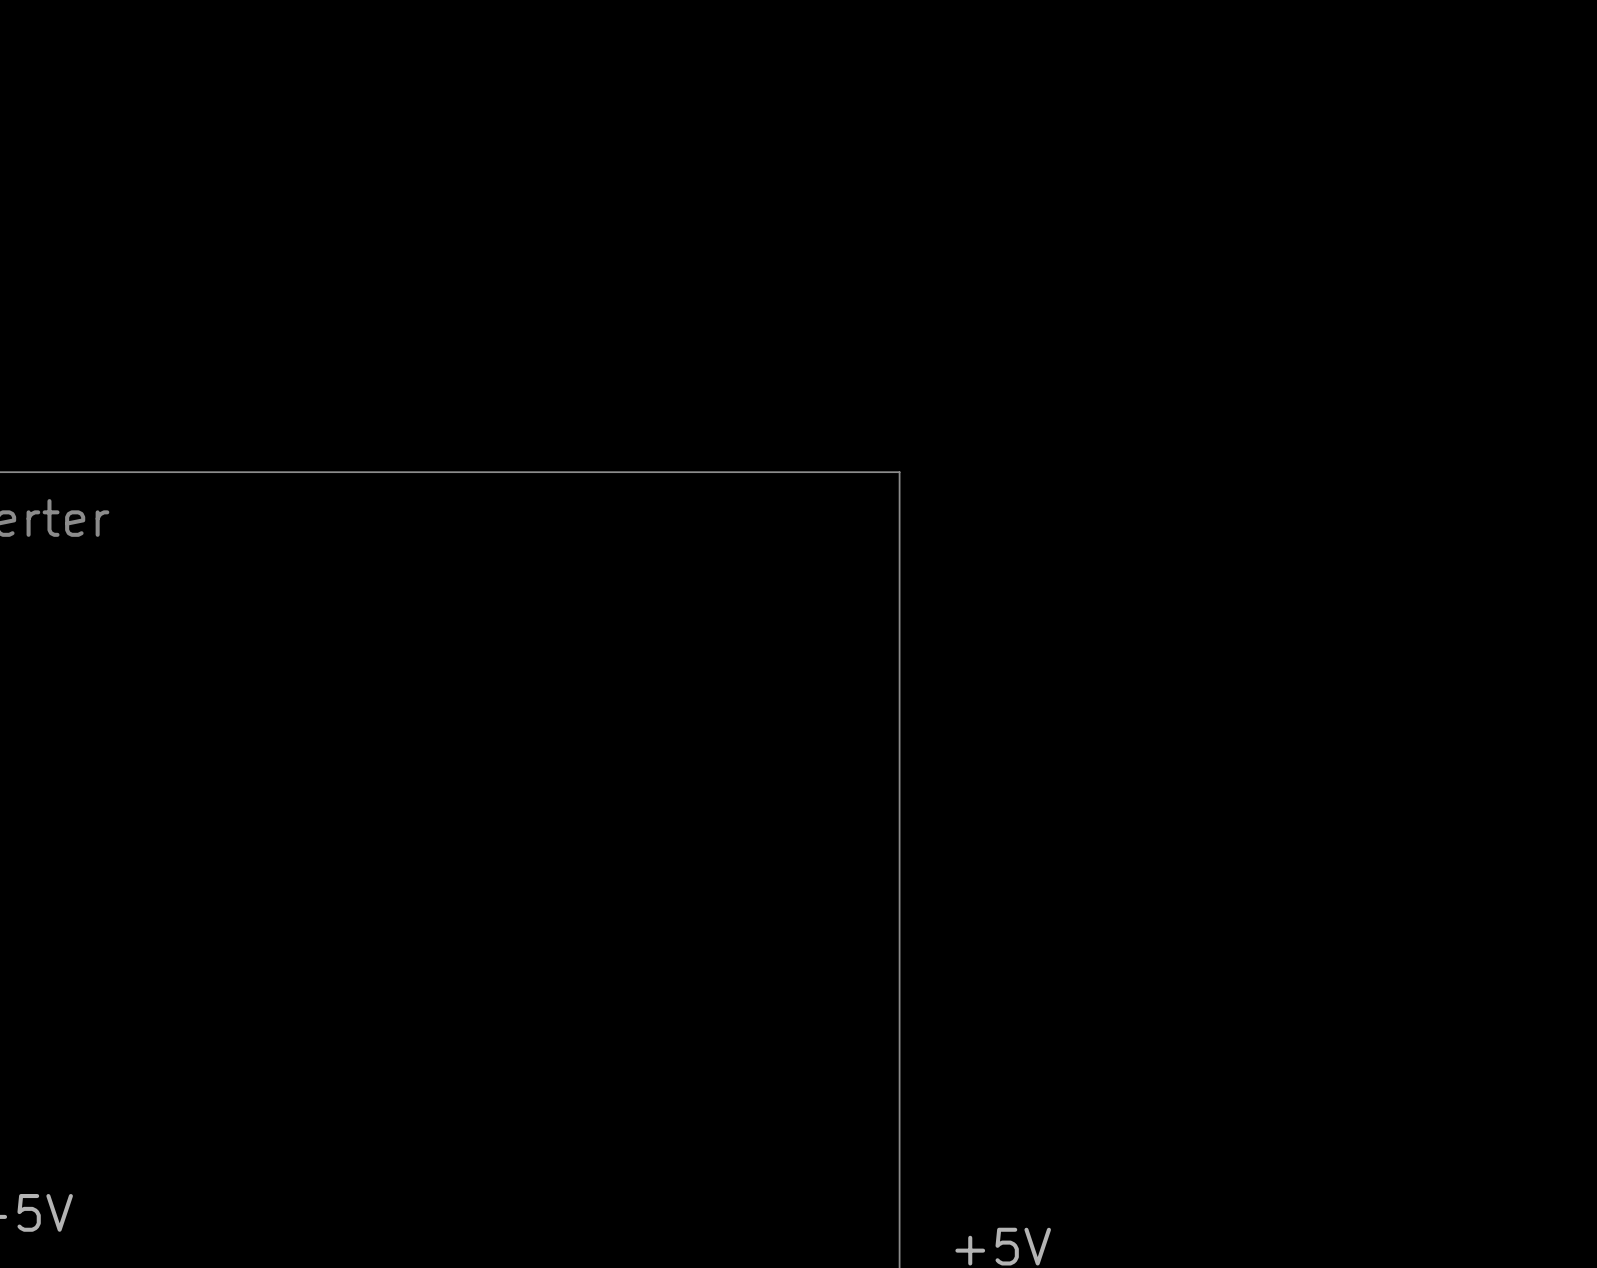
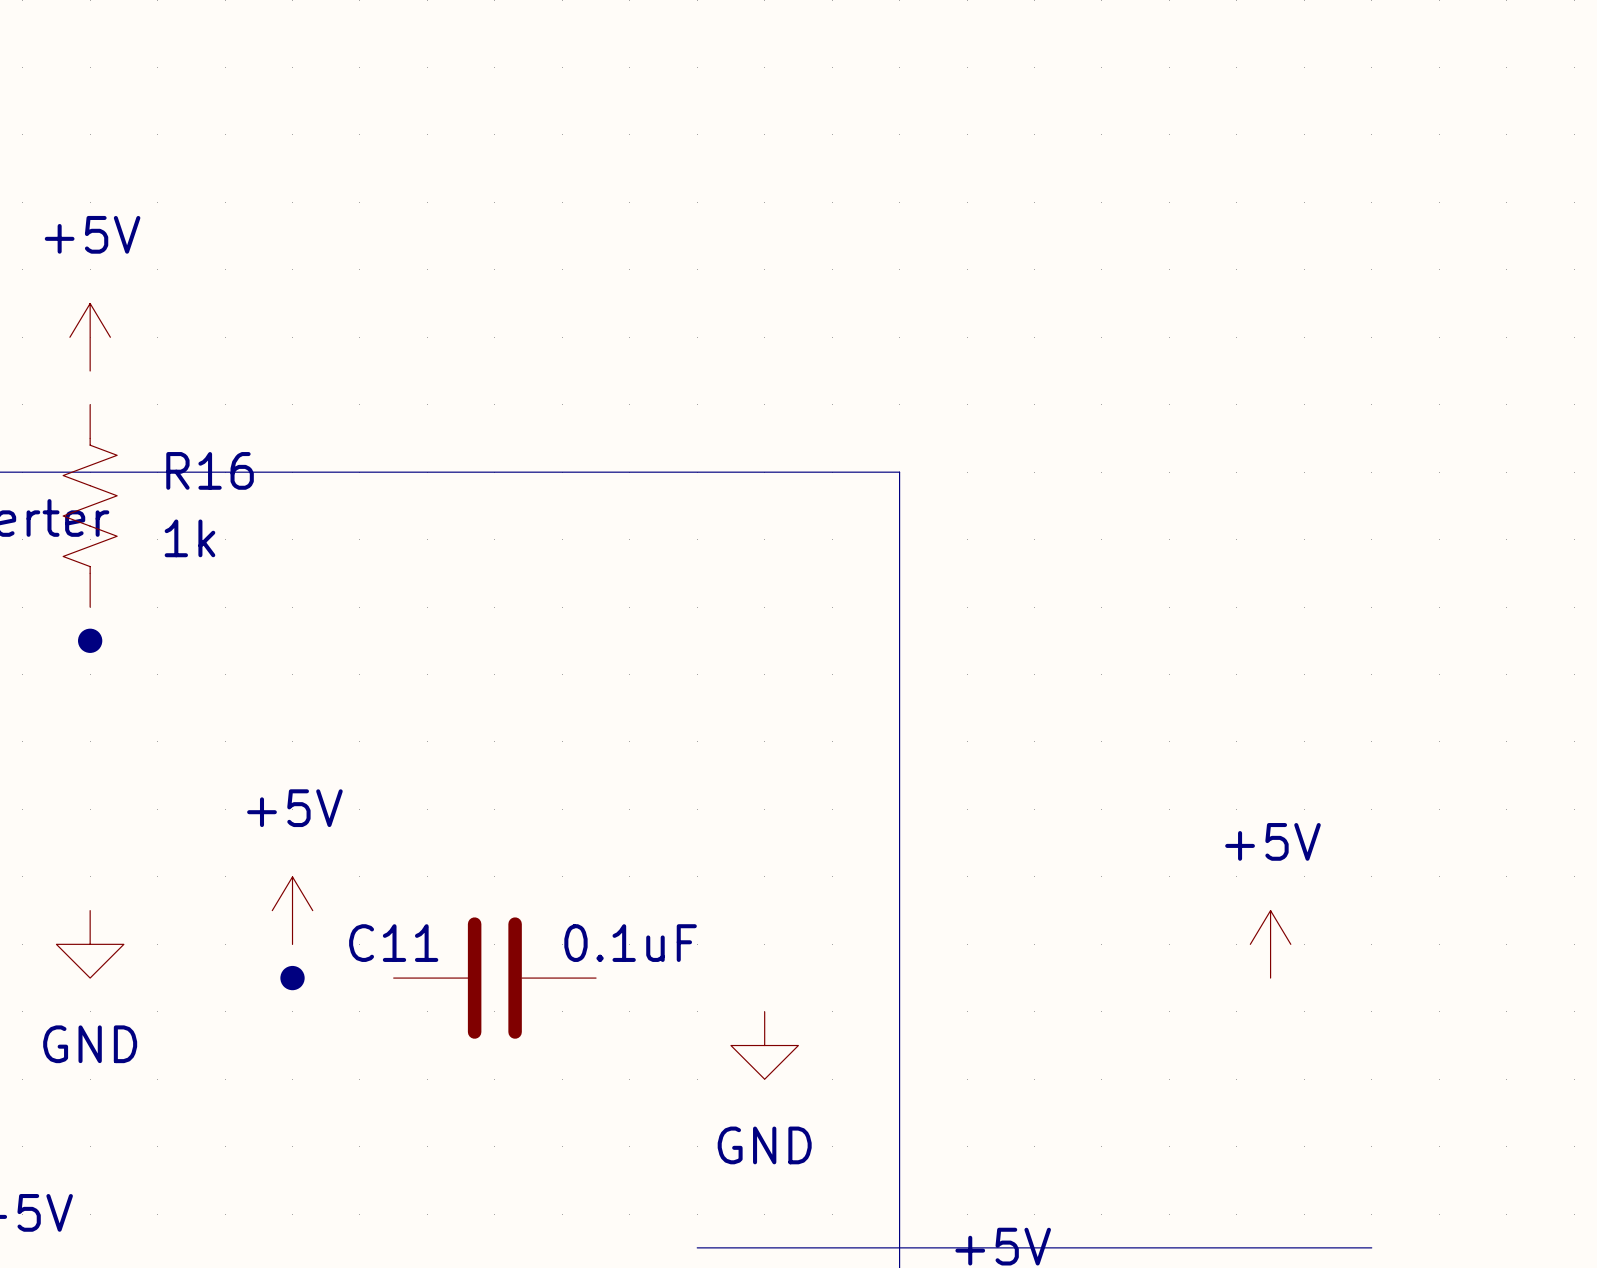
power symbol: none -> +5V (90, 337)
R16: none -> 1k (90, 505)
junction: none -> (90, 640)
power symbol: none -> +5V (292, 910)
power symbol: none -> GND (90, 944)
power symbol: none -> +5V (1270, 944)
junction: none -> (292, 978)
C11: none -> 0.1uF (494, 978)
power symbol: none -> GND (764, 1045)
wire: none -> (697, 1247) (1371, 1247)

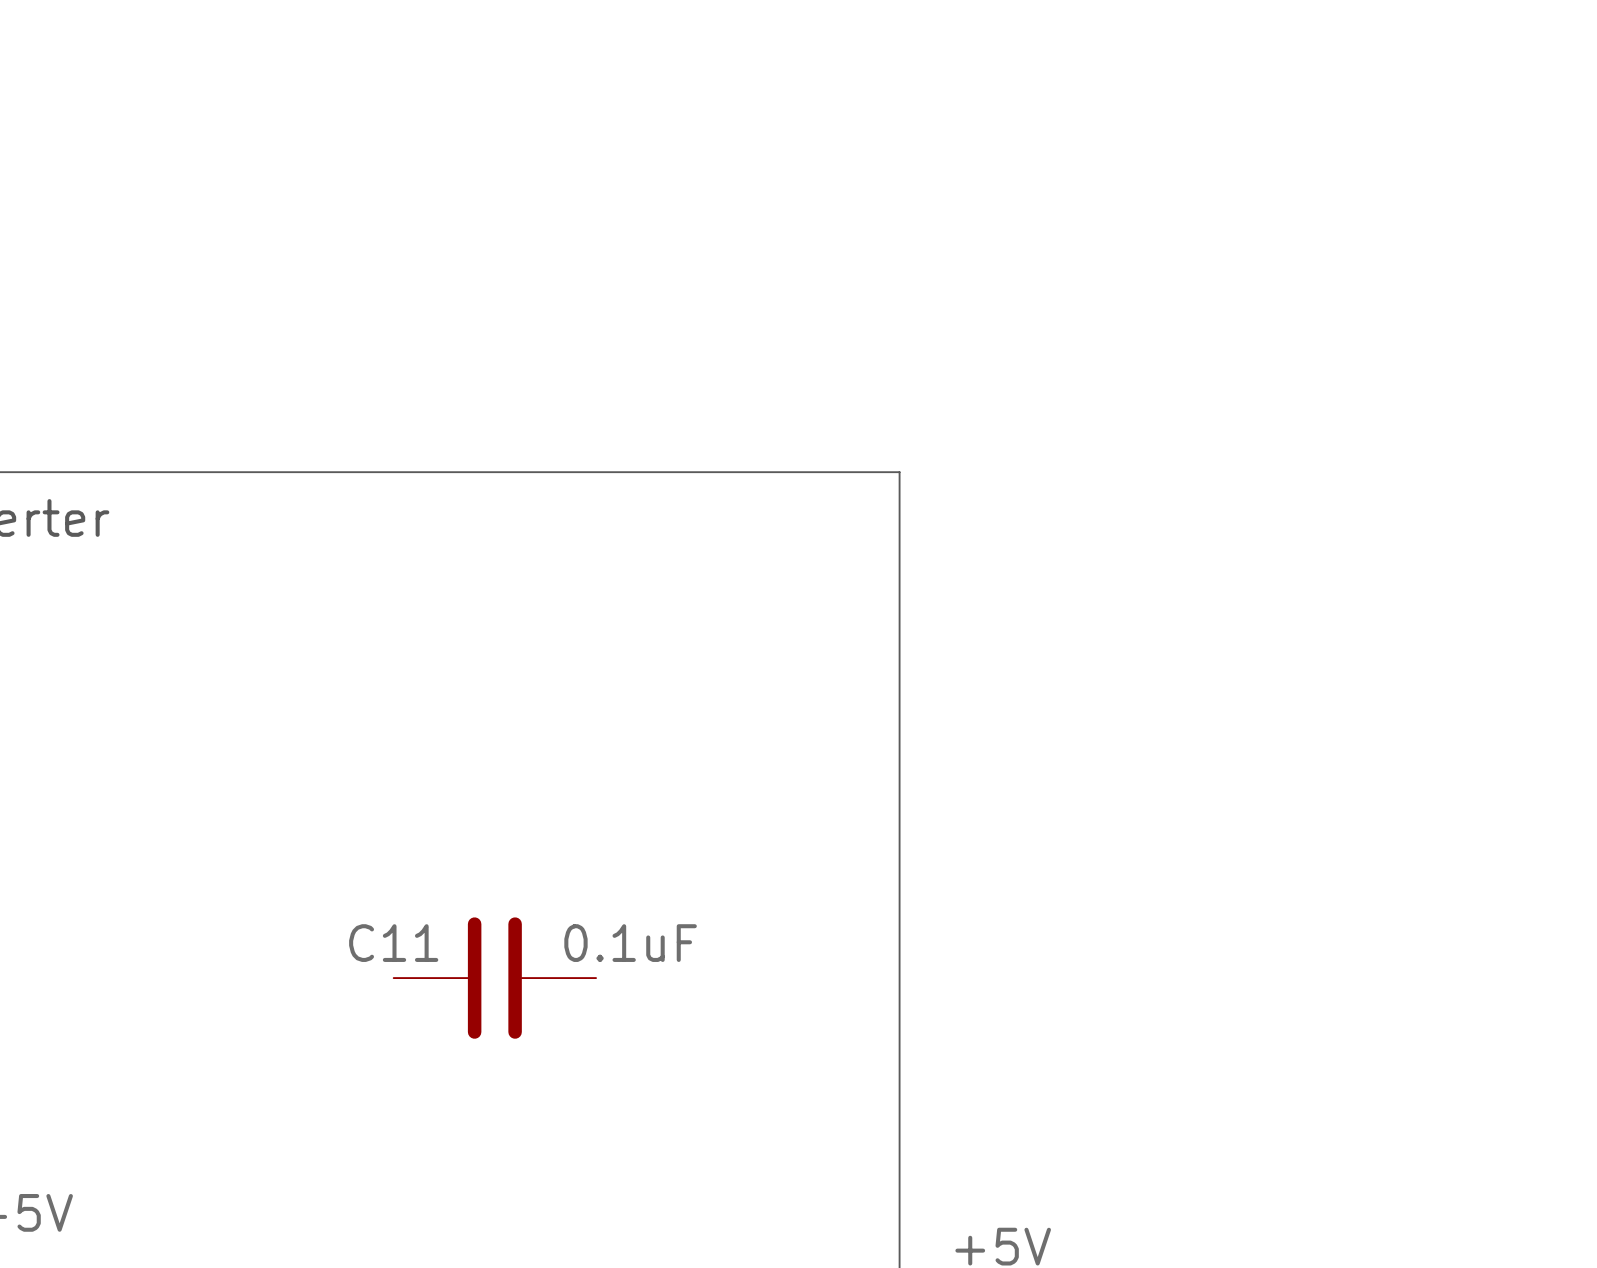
power symbol: +5V (90, 337) -> none
R16: 1k (90, 505) -> none
junction: (90, 640) -> none
power symbol: +5V (292, 910) -> none
power symbol: GND (90, 944) -> none
power symbol: +5V (1270, 944) -> none
junction: (292, 978) -> none
power symbol: GND (764, 1045) -> none
wire: (697, 1247) (1371, 1247) -> none

